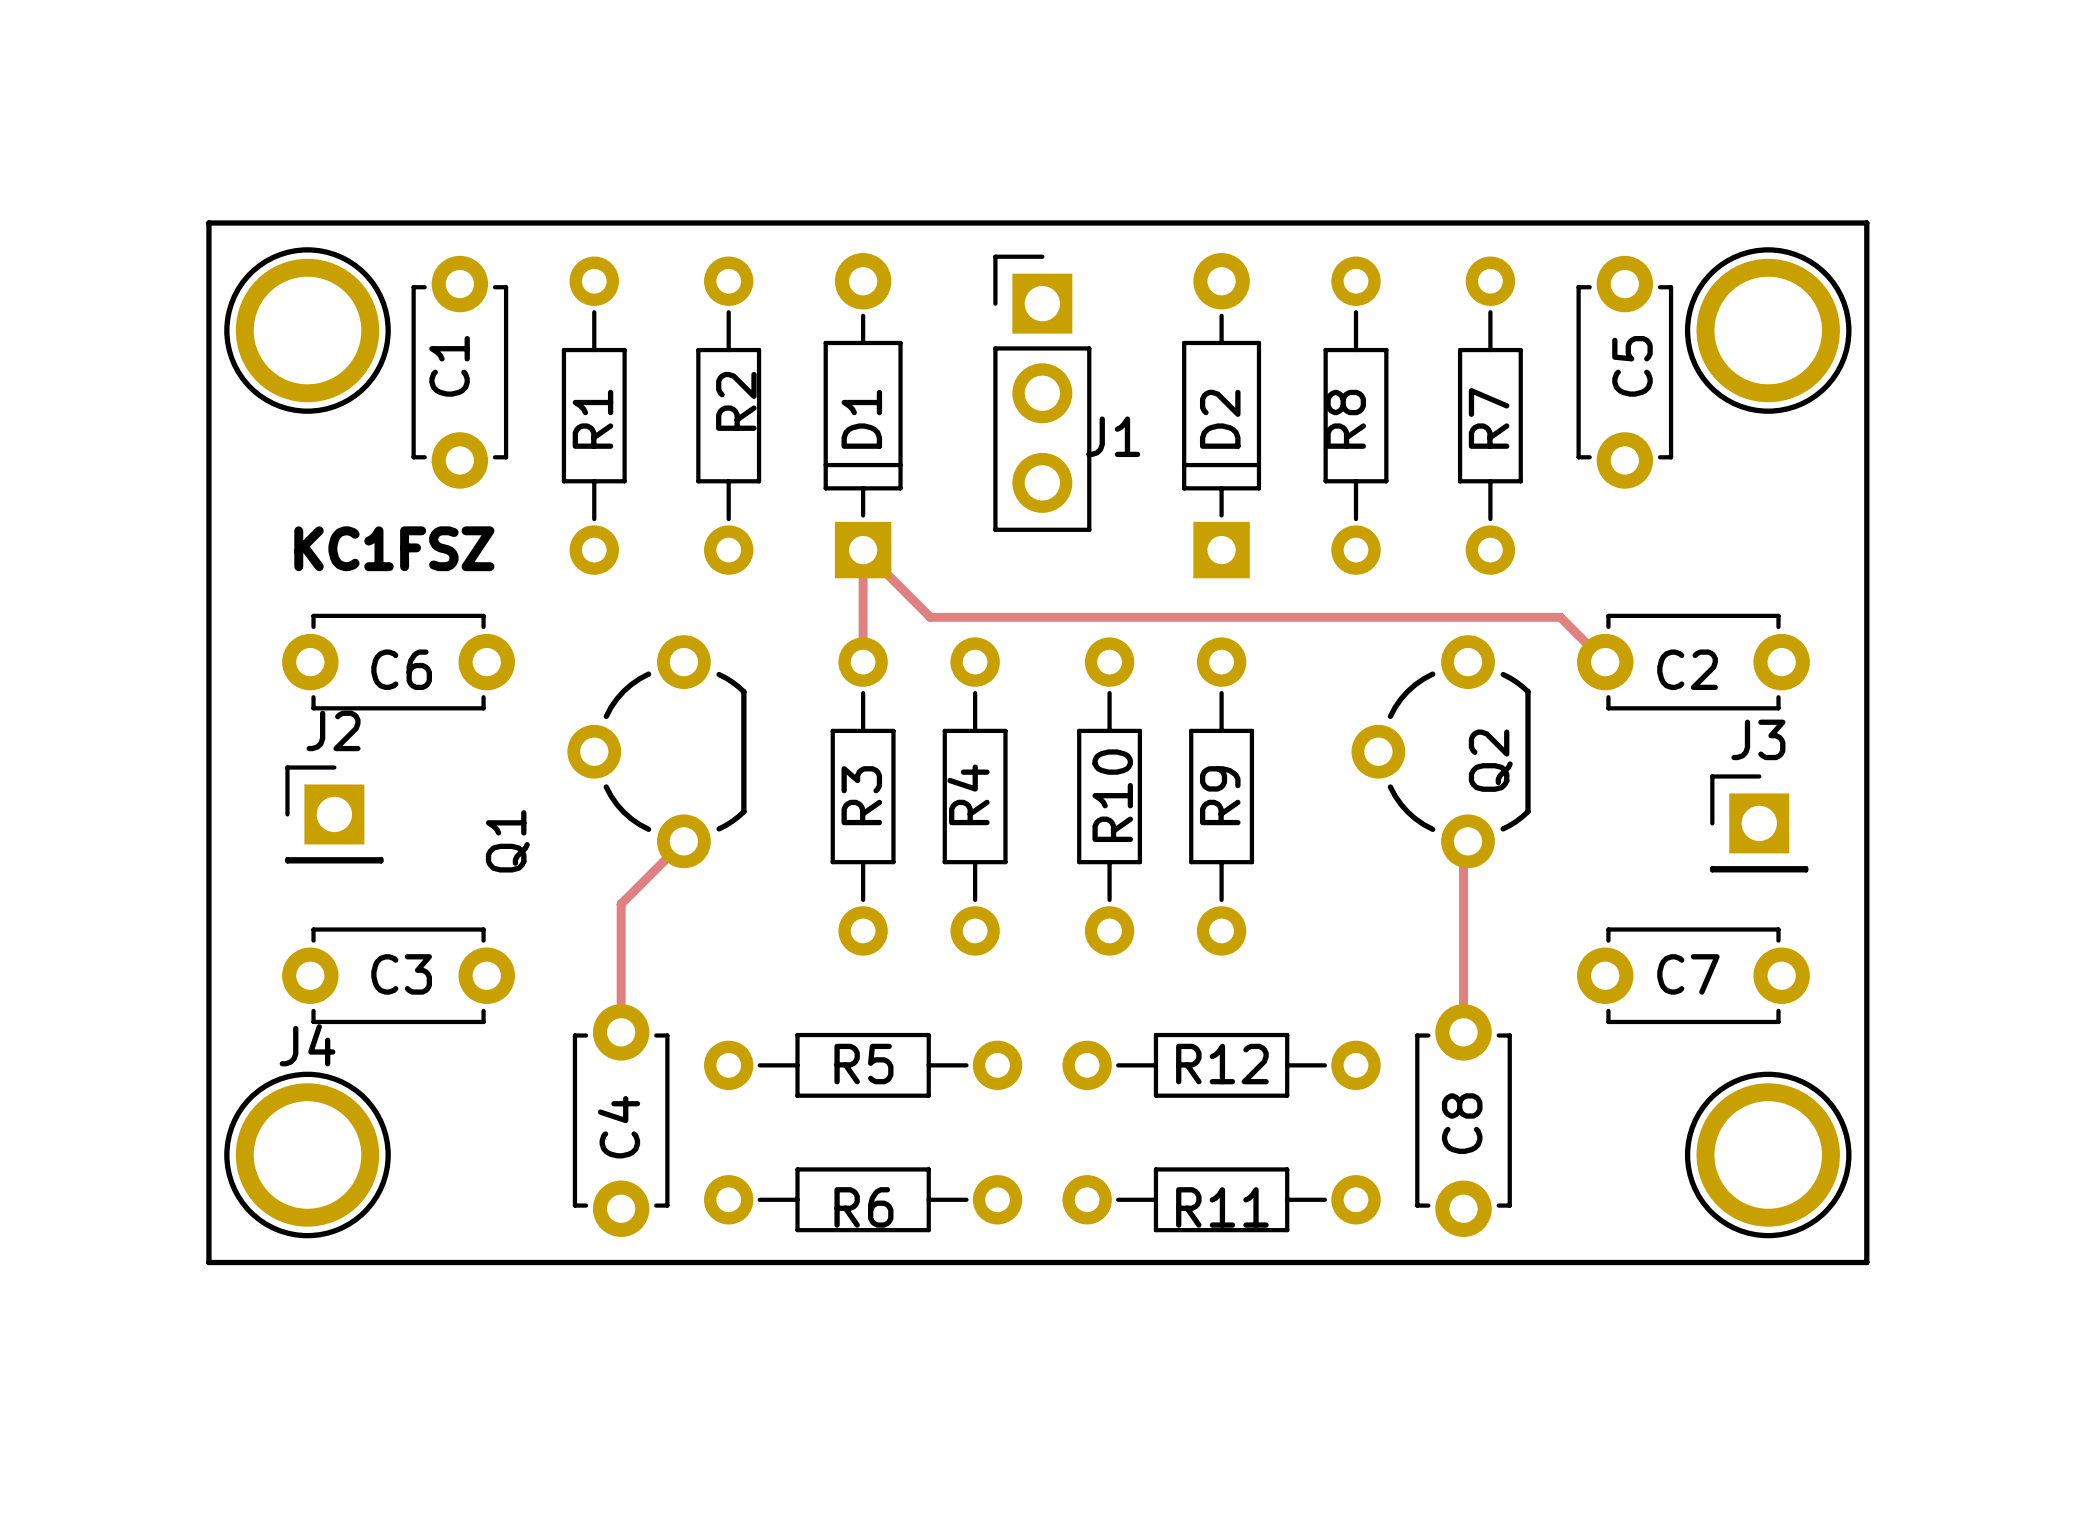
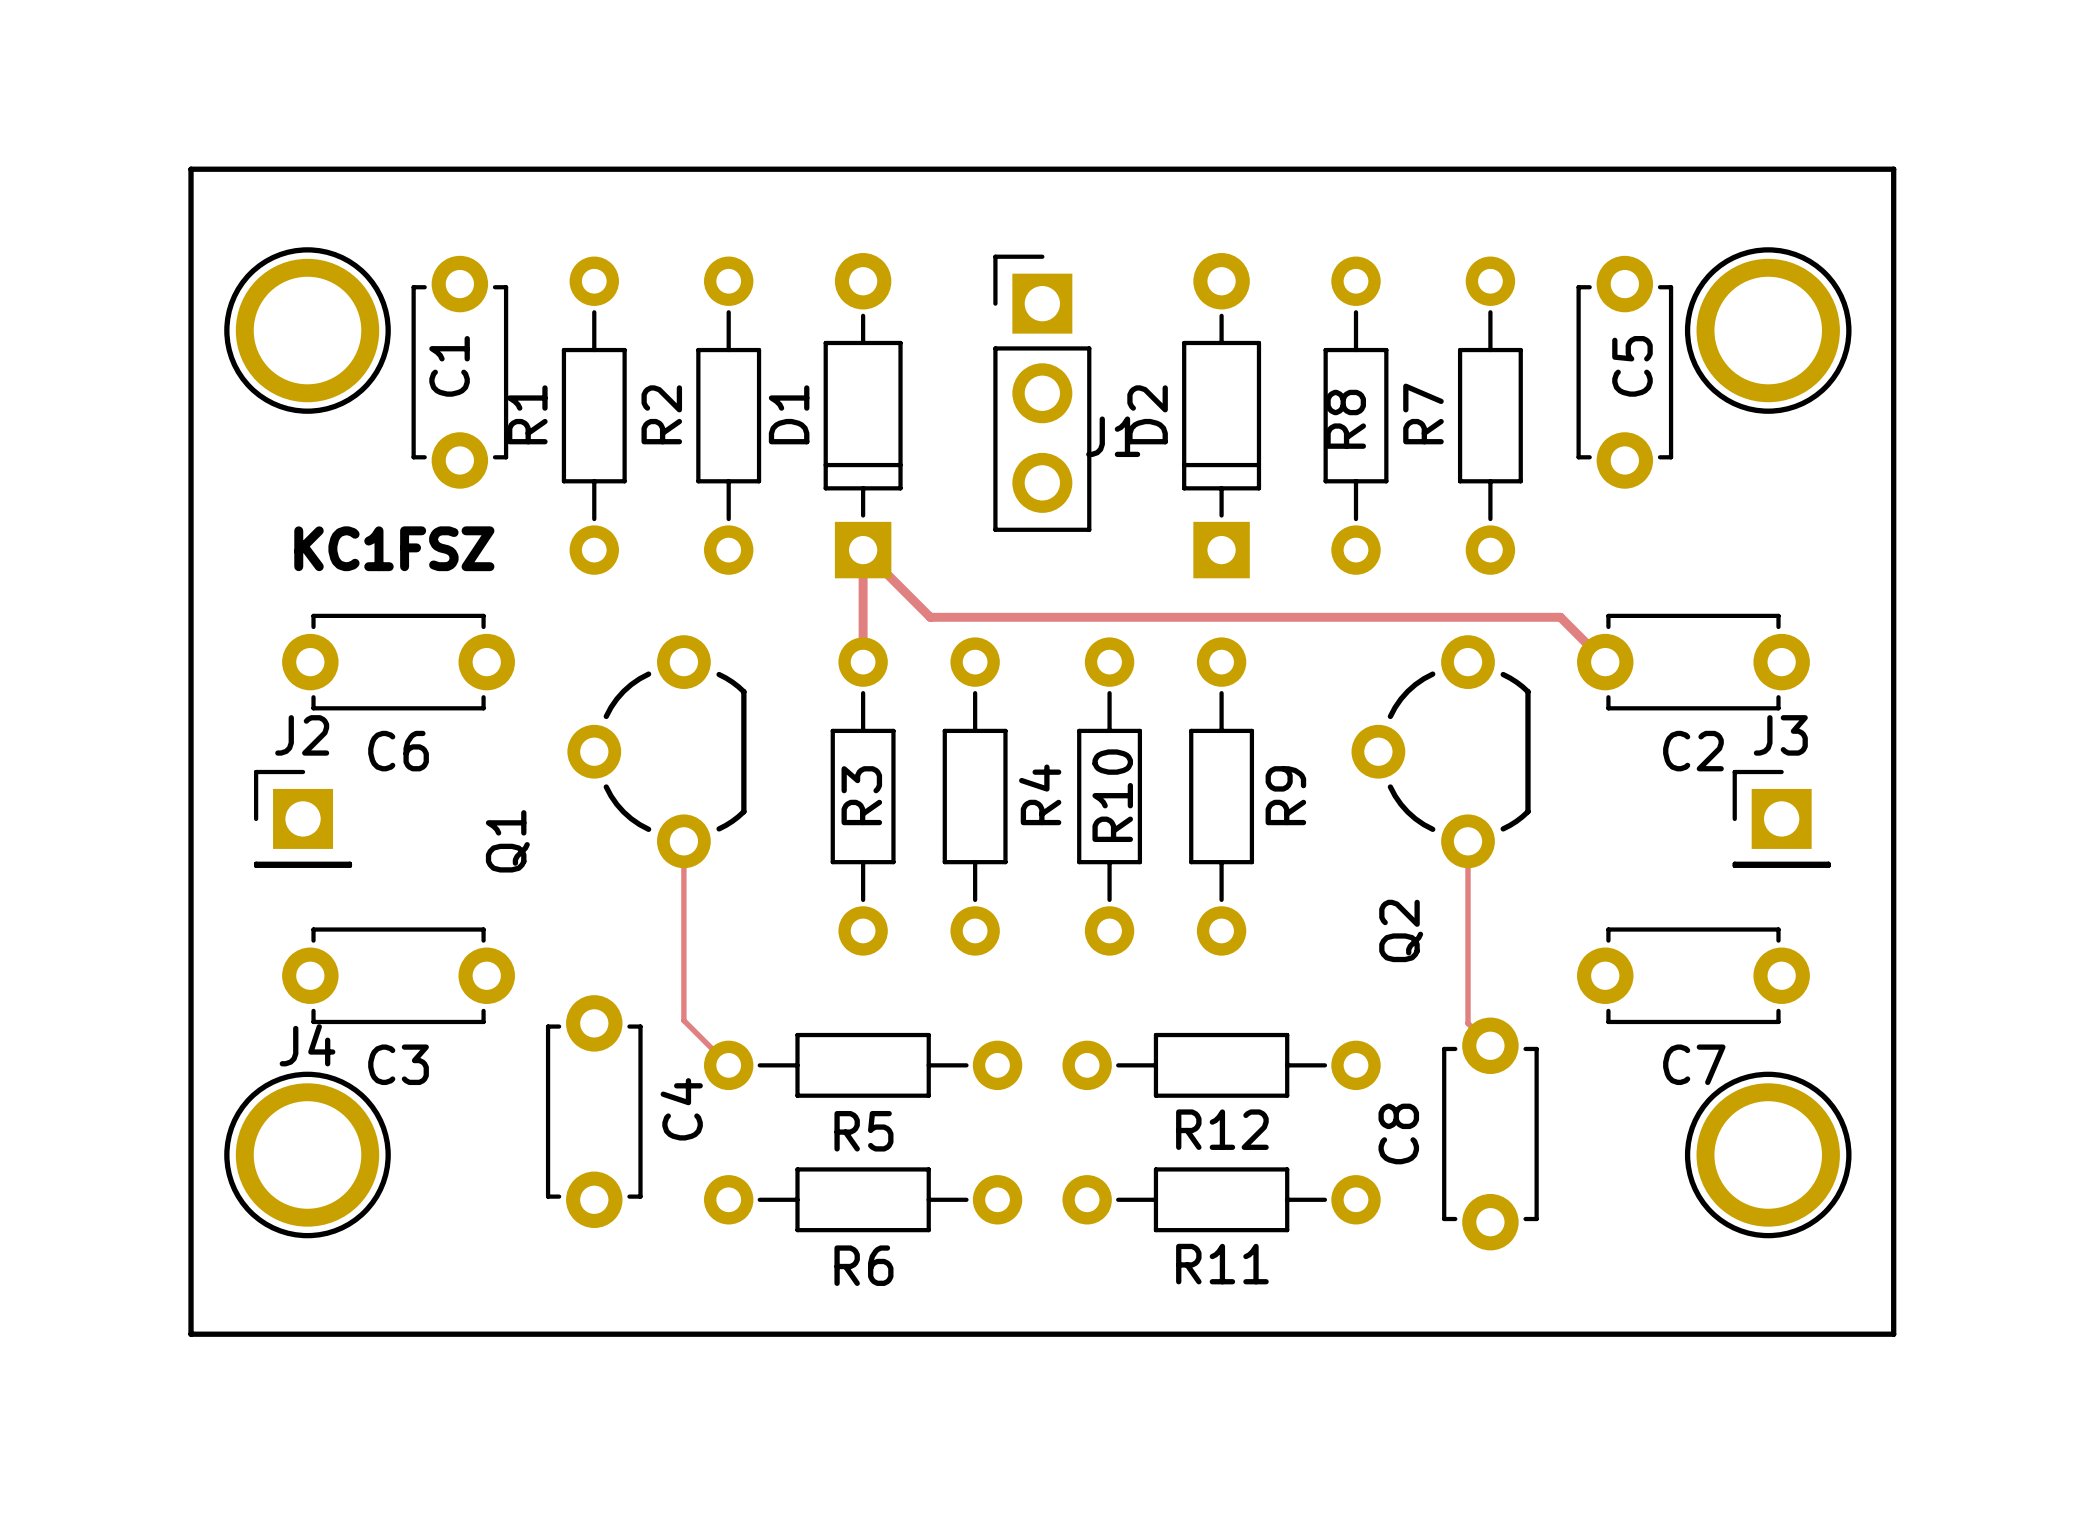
board edge: (208, 222) (1866, 222) (1866, 1262) (208, 1262) (208, 222) -> (191, 169) (191, 1334) (1893, 1334) (1893, 169) (191, 169)
R2 name position: R2 (736, 401) -> R2 (661, 414)
R7 name position: R7 (1489, 418) -> R7 (1423, 413)
R1 name position: R1 (592, 419) -> R1 (527, 414)
D1 name position: D1 (861, 419) -> D1 (789, 414)
D2 name position: D2 (1220, 419) -> D2 (1147, 414)
C6 name position: C6 (401, 669) -> C6 (398, 751)
C2 name position: C2 (1687, 669) -> C2 (1693, 751)
Q2 name position: Q2 (1490, 760) -> Q2 (1401, 930)
R4 name position: R4 (968, 794) -> R4 (1040, 794)
R9 name position: R9 (1220, 795) -> R9 (1285, 795)
J2 position: (334, 814) -> (303, 818)
J3 position: (1759, 823) -> (1781, 818)
track: (683, 841) (621, 904) (621, 1032) -> (683, 841) (683, 1020) (728, 1065)
track: (1468, 841) (1463, 845) (1463, 1032) -> (1468, 841) (1468, 1023) (1490, 1045)
C3 name position: C3 (401, 974) -> C3 (398, 1064)
C7 name position: C7 (1688, 974) -> C7 (1694, 1064)
R5 name position: R5 (863, 1064) -> R5 (863, 1131)
R12 name position: R12 (1222, 1064) -> R12 (1222, 1129)
C4 position: (621, 1120) -> (594, 1111)
C8 position: (1463, 1120) -> (1490, 1133)
C8 name position: C8 (1462, 1123) -> C8 (1398, 1133)
C4 name position: C4 (619, 1127) -> C4 (681, 1109)
R6 name position: R6 (863, 1207) -> R6 (863, 1265)
R11 name position: R11 (1222, 1207) -> R11 (1222, 1264)

